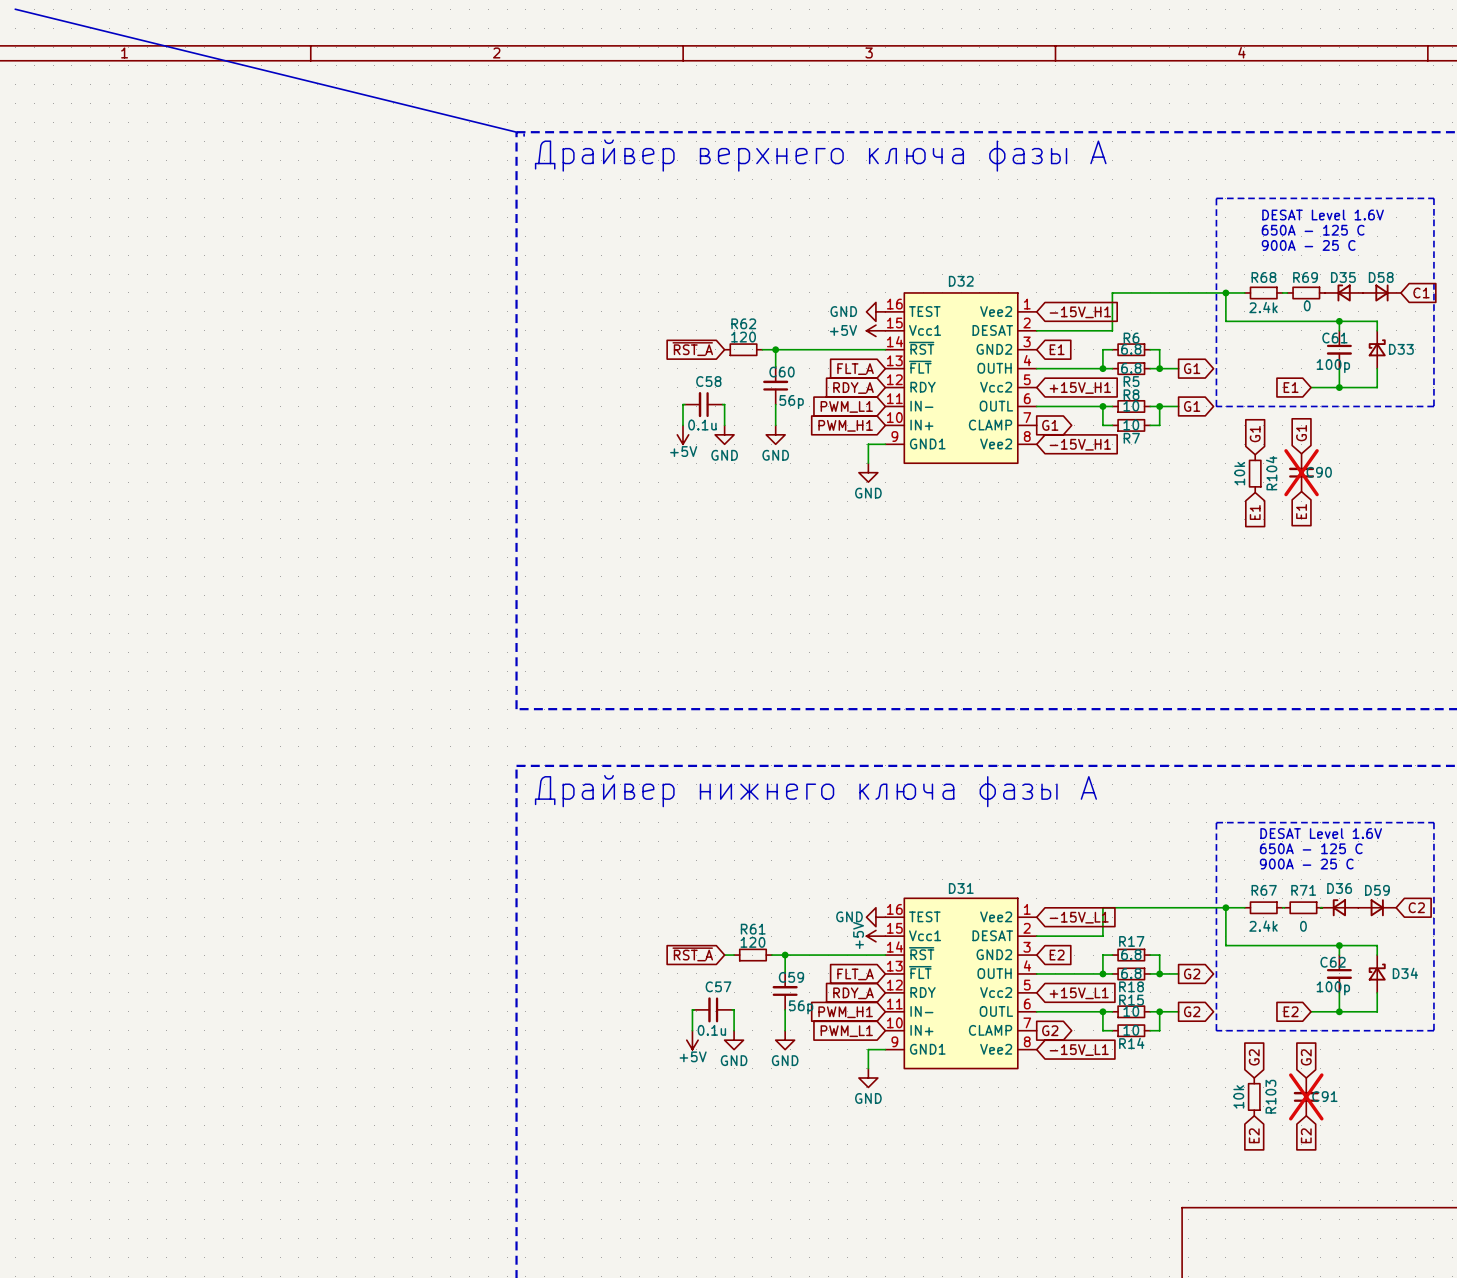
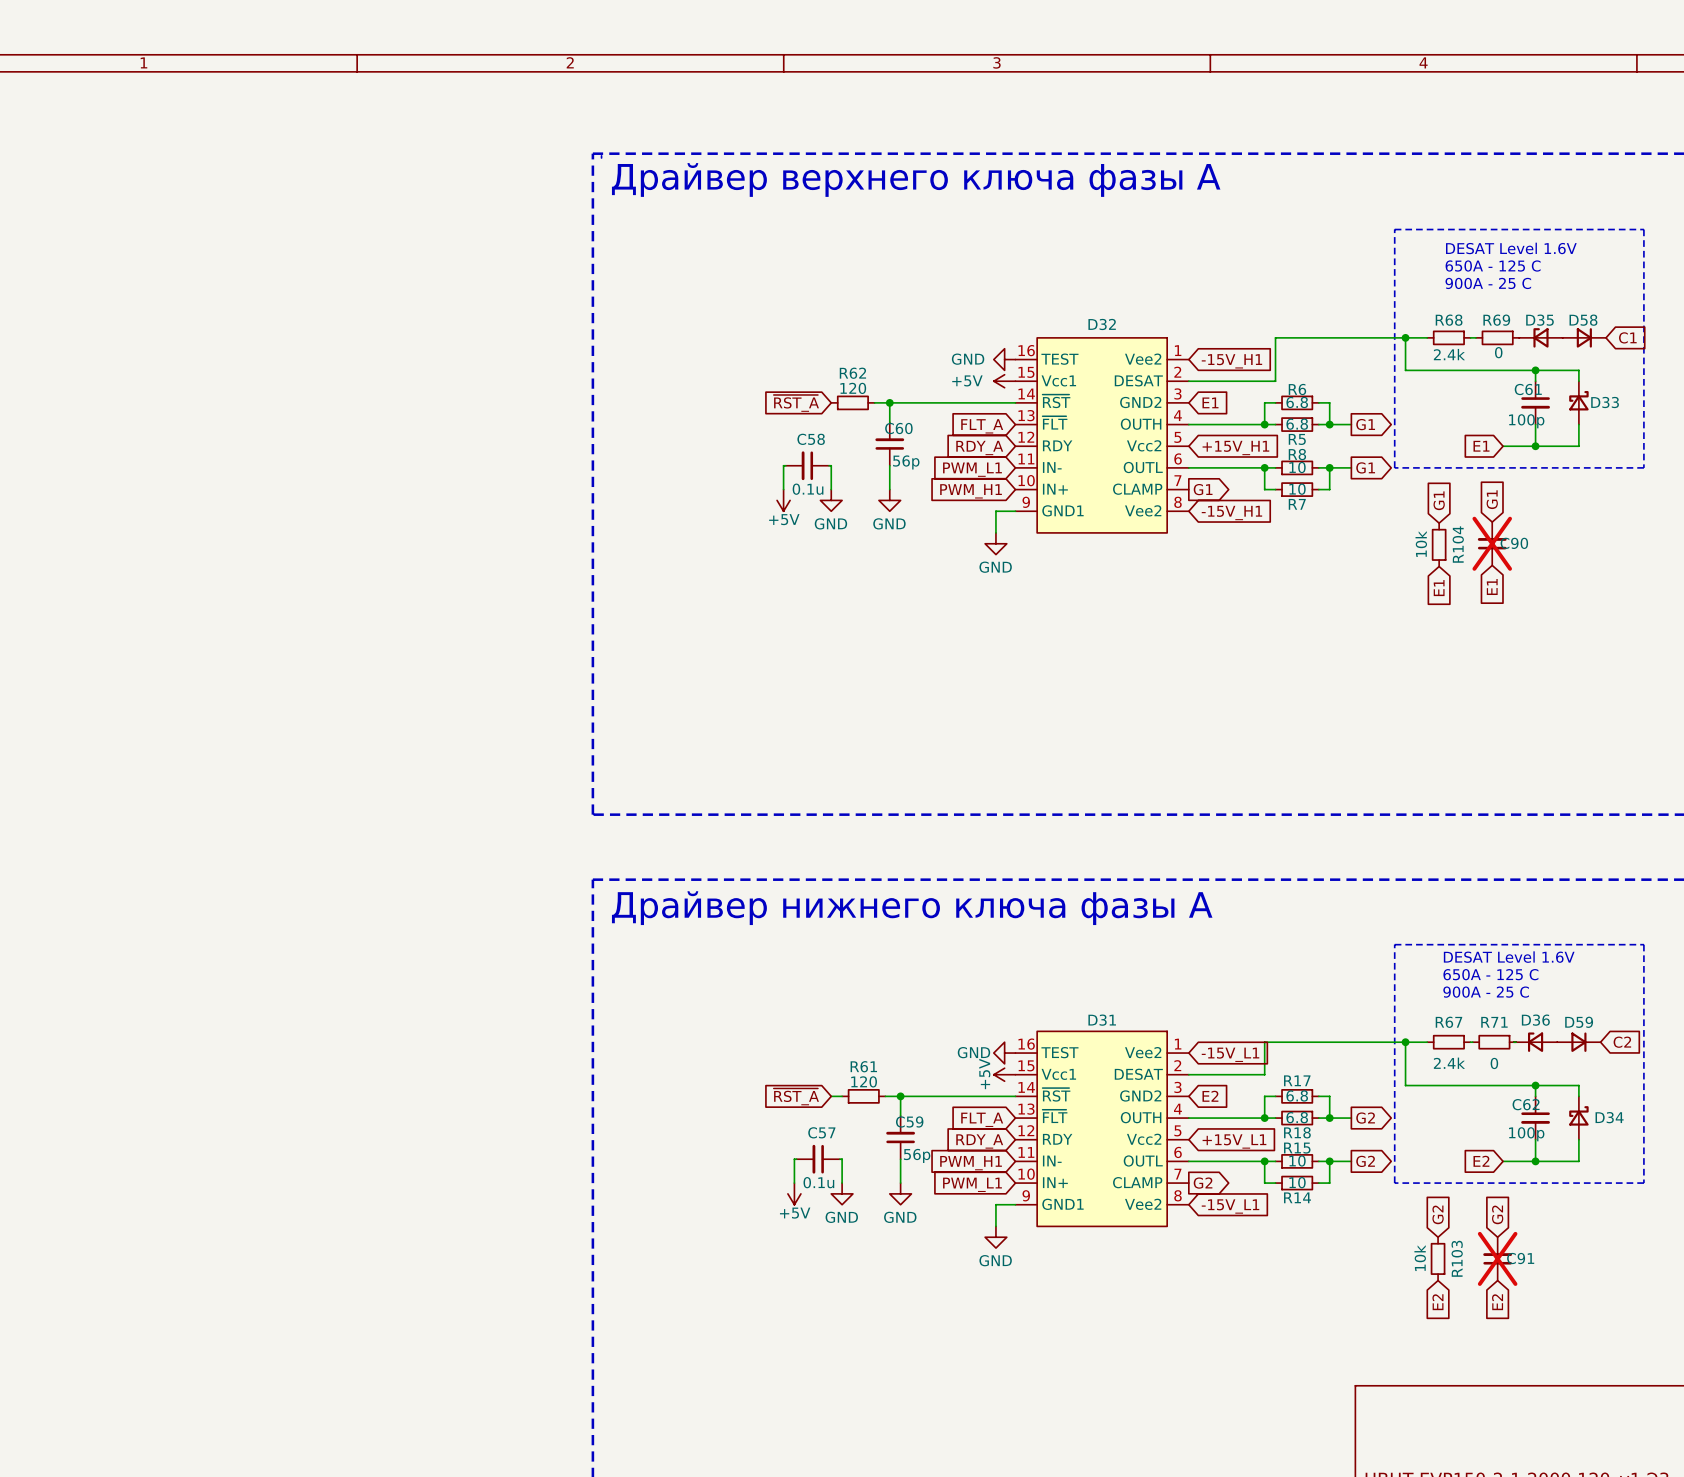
line: (15, 9) (516, 132) -> none

